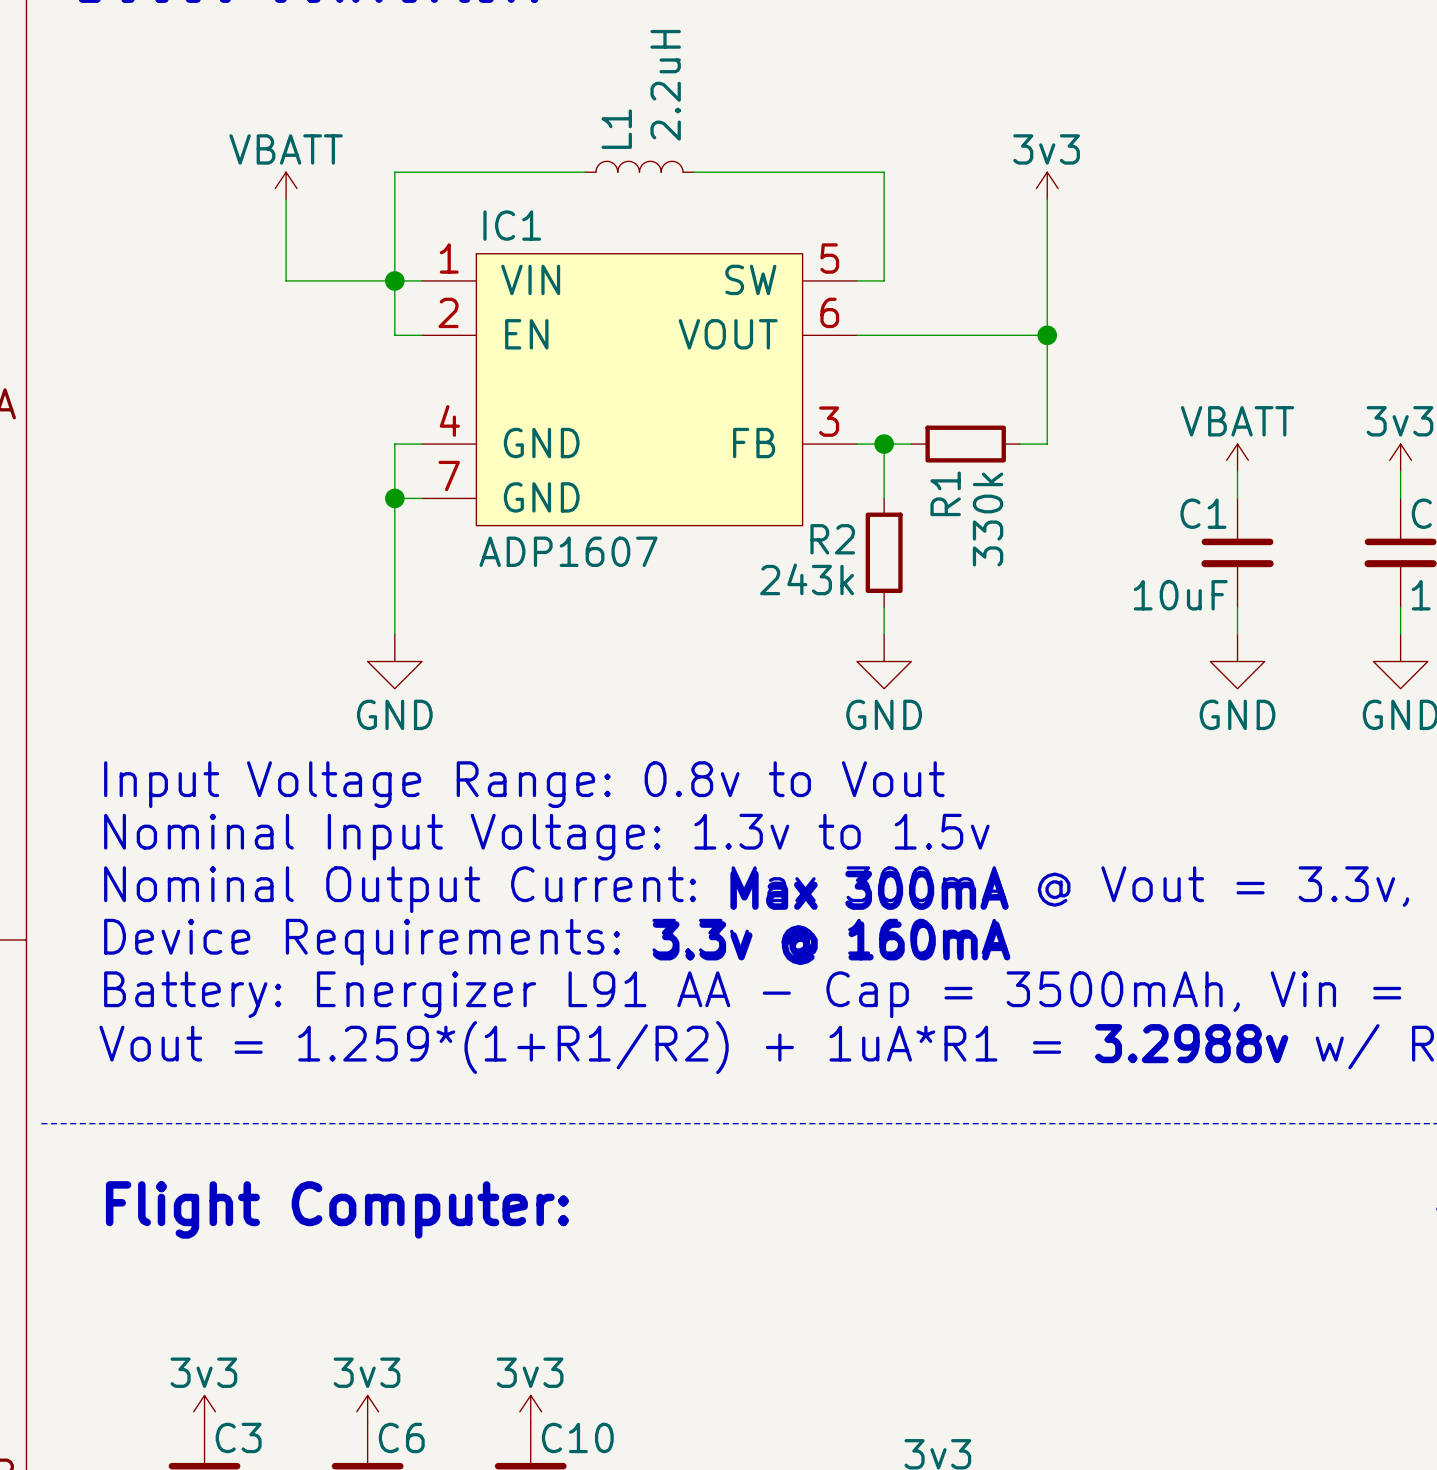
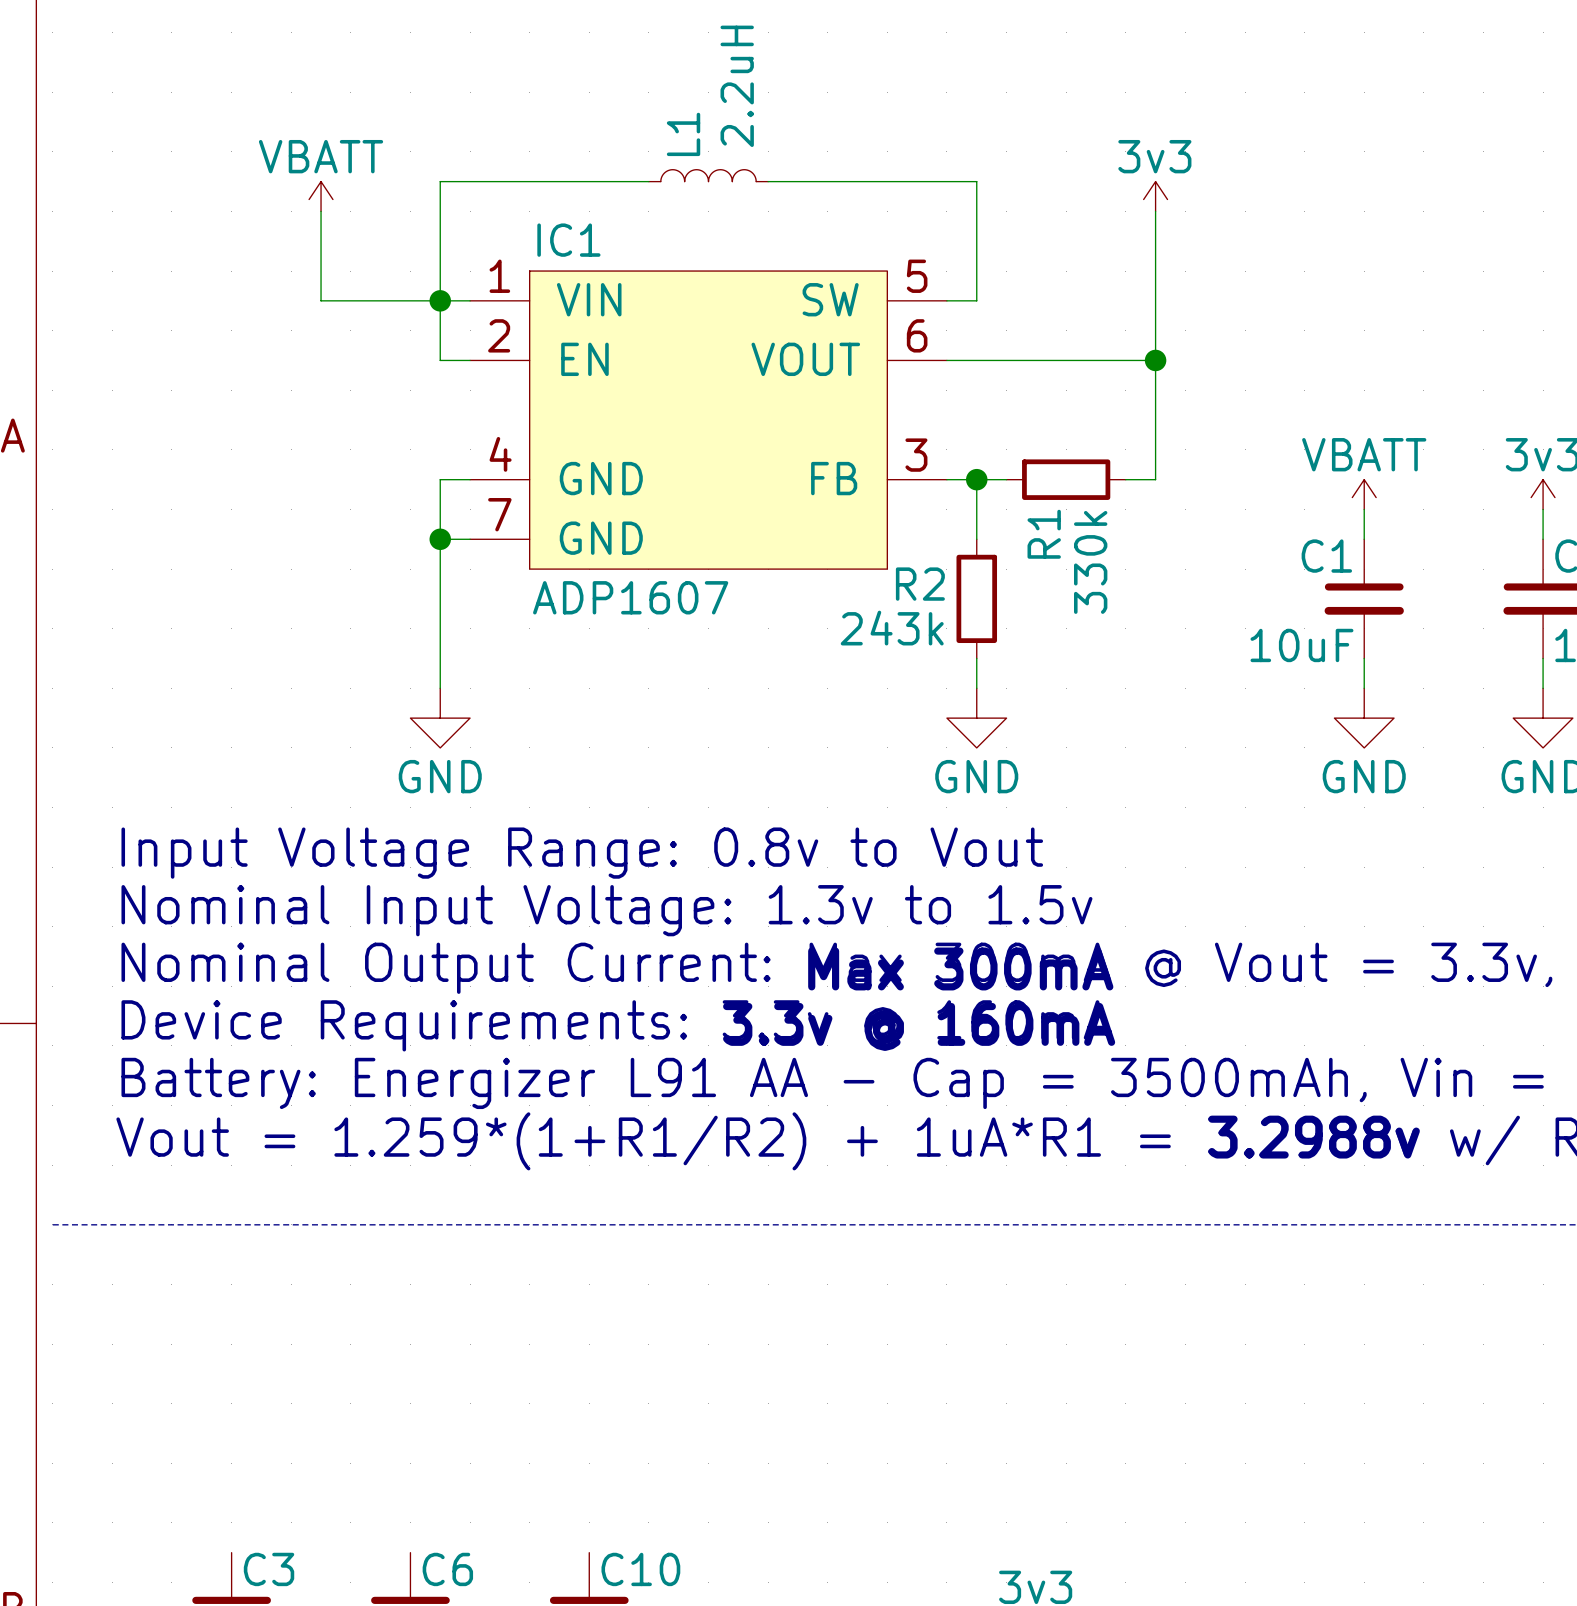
text: Flight Computer: (337, 1209) -> none
power symbol: 3v3 (204, 1409) -> none
power symbol: 3v3 (367, 1409) -> none
power symbol: 3v3 (530, 1409) -> none

